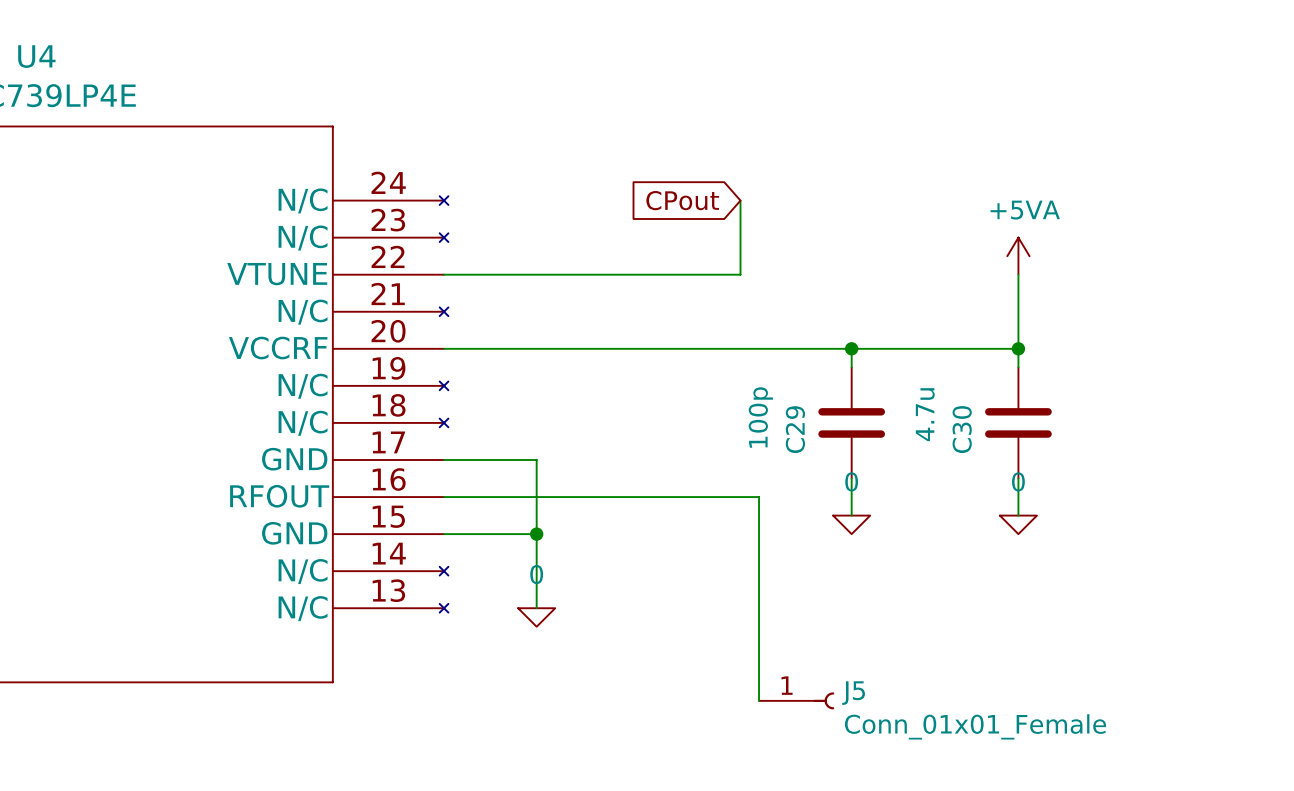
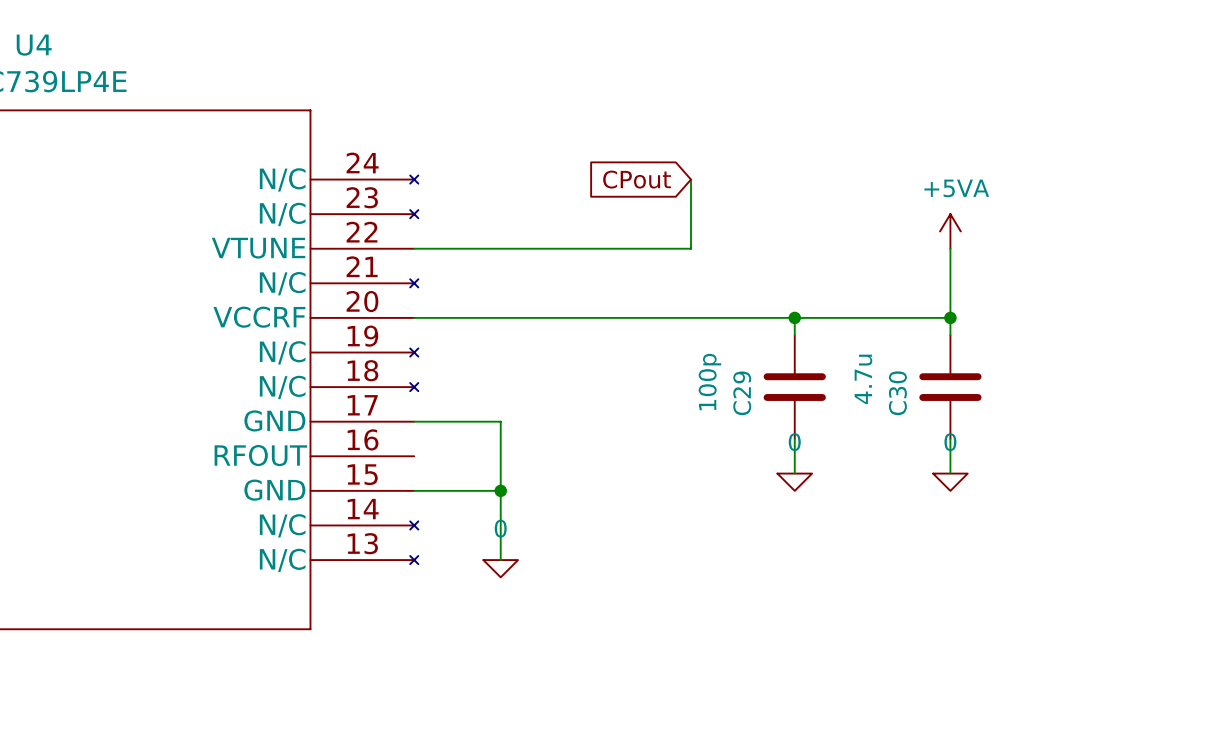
wire: (444, 497) (759, 497) (759, 700) -> none
J5: Conn_01x01_Female (796, 700) -> none

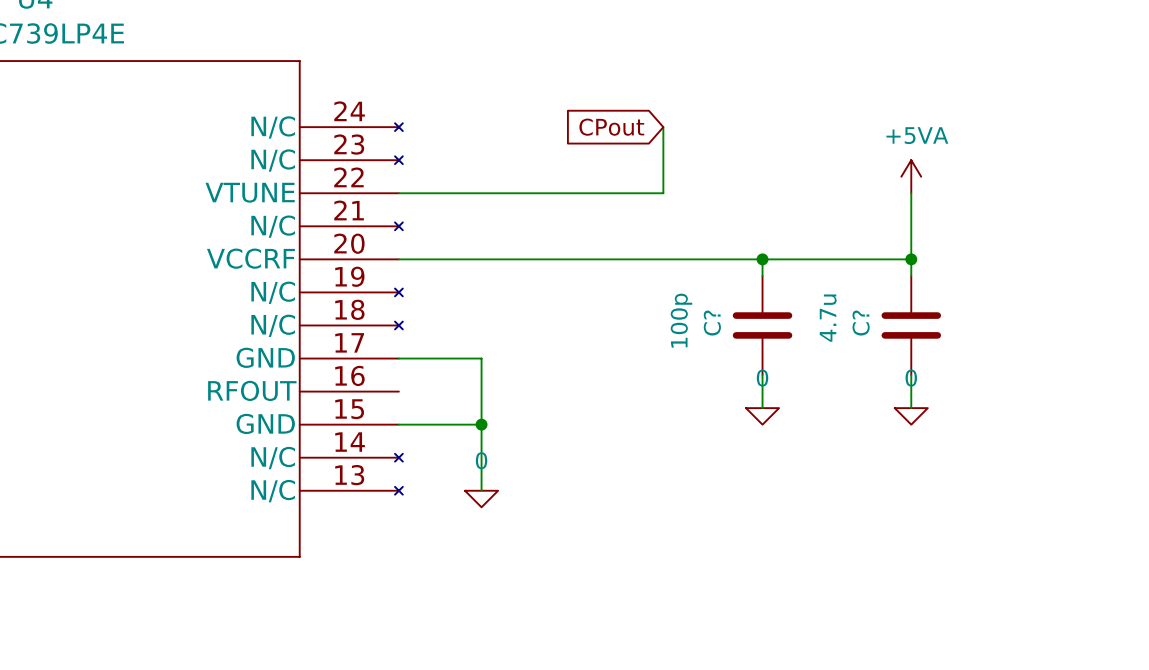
C29 name: C29 (742, 393) -> C? (712, 323)
C30 name: C30 (897, 393) -> C? (861, 323)

